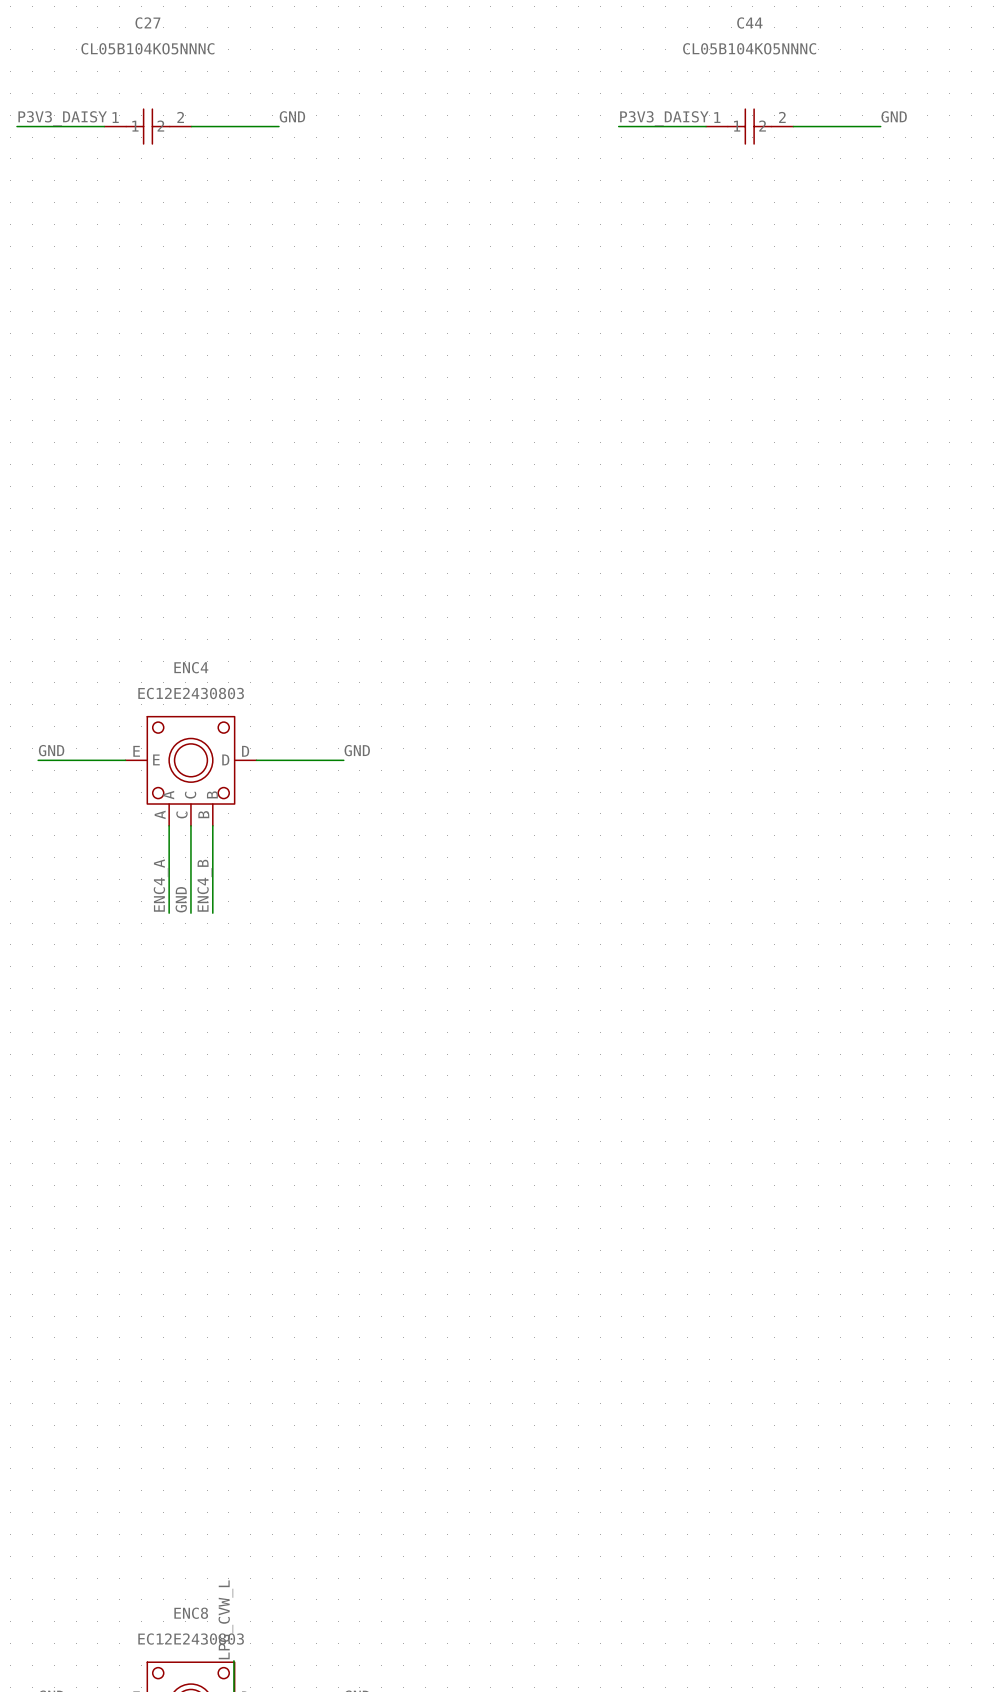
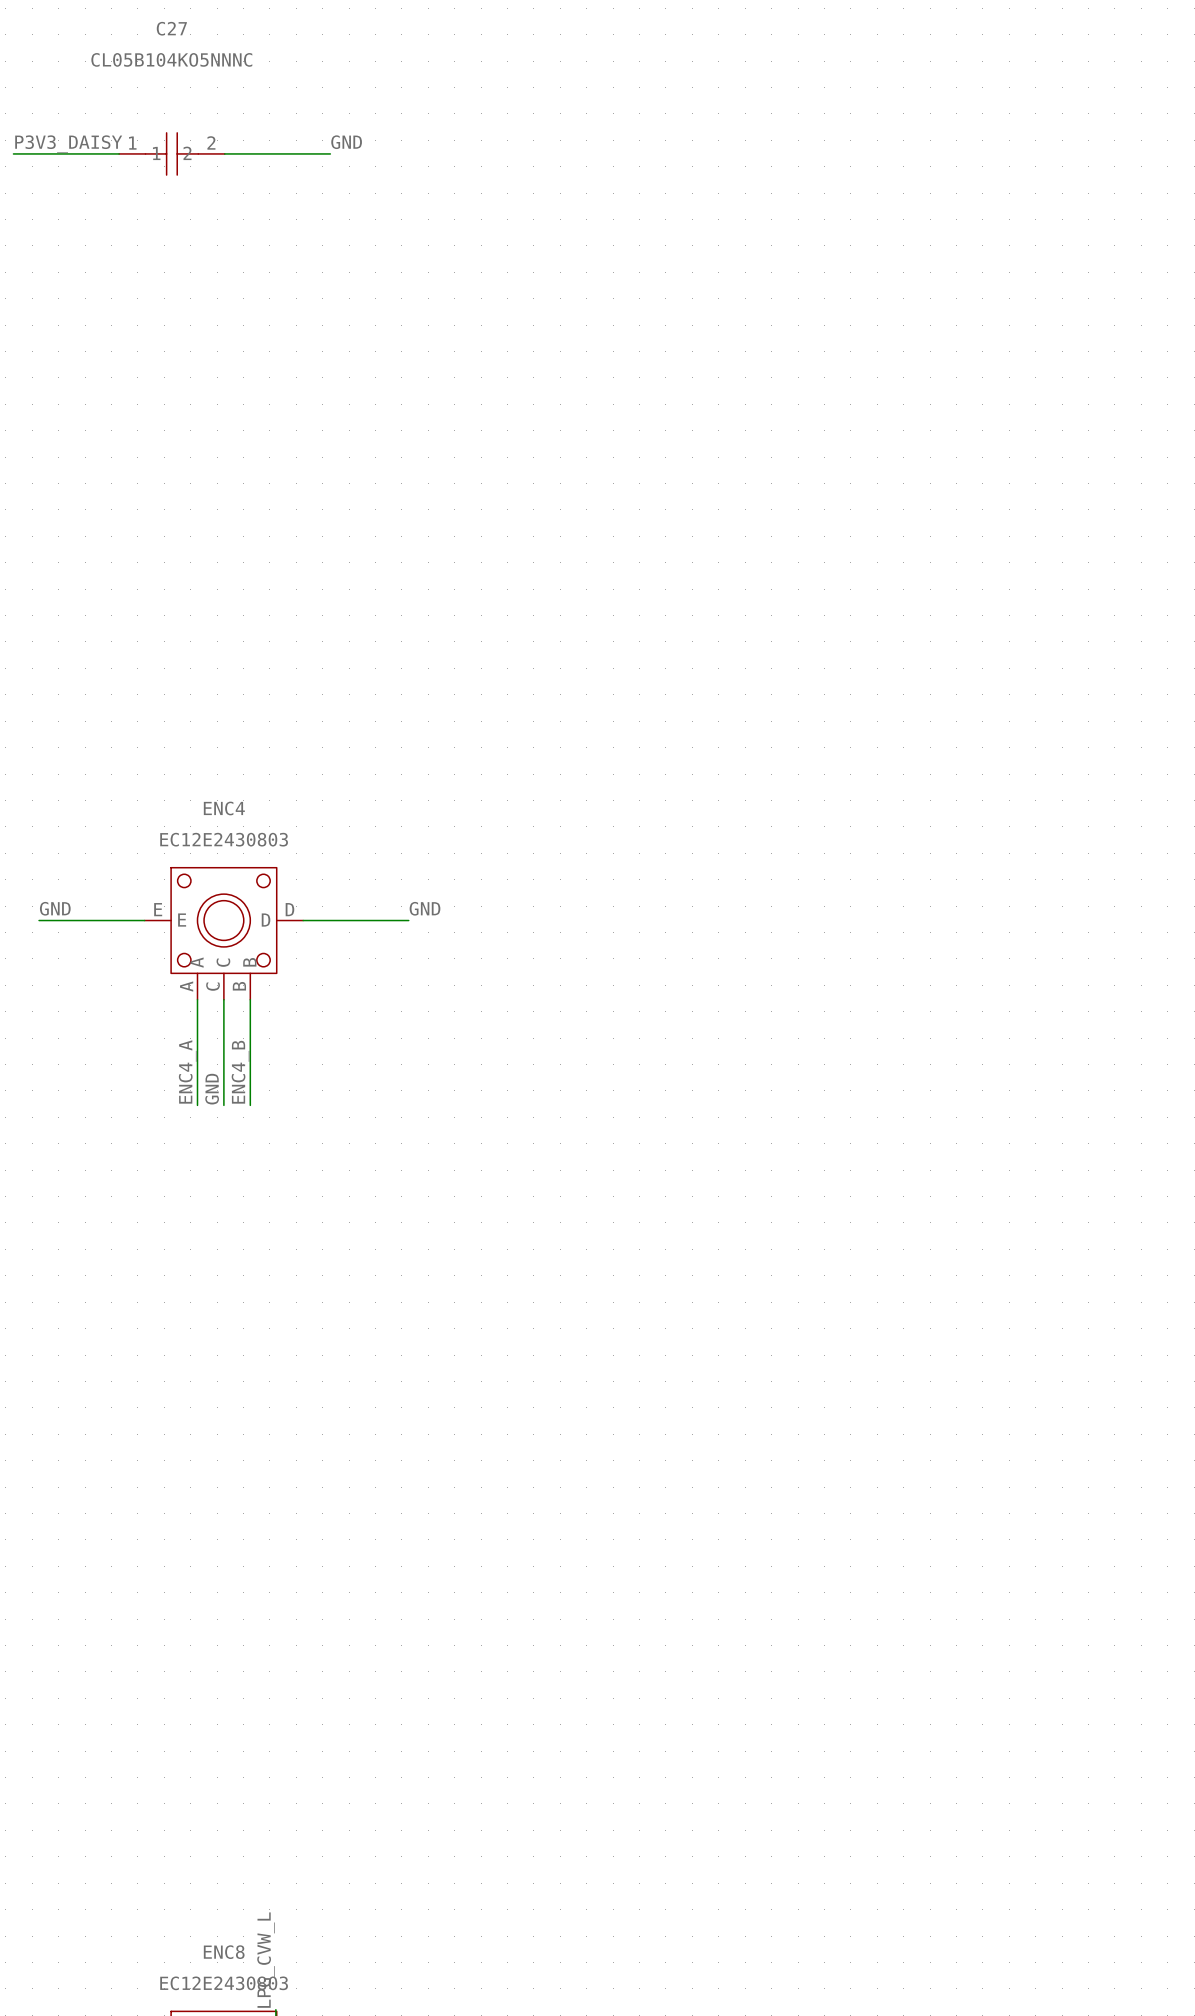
label: GND (894, 116) -> none
label: P3V3_DAISY (664, 118) -> none
wire: (618, 126) (706, 126) -> none
C44: CL05B104KO5NNNC (749, 126) -> none
wire: (793, 126) (880, 126) -> none

